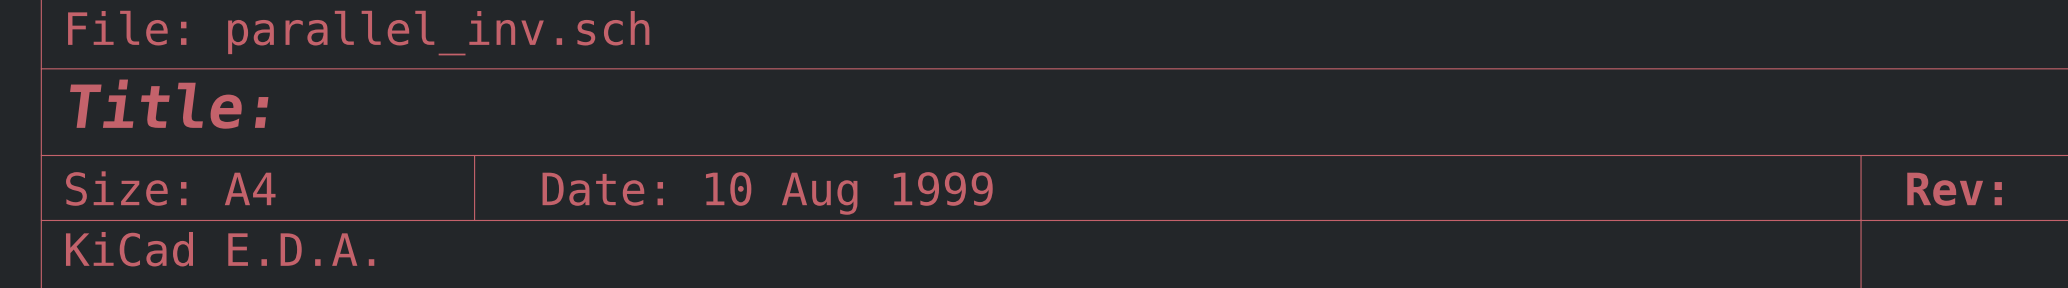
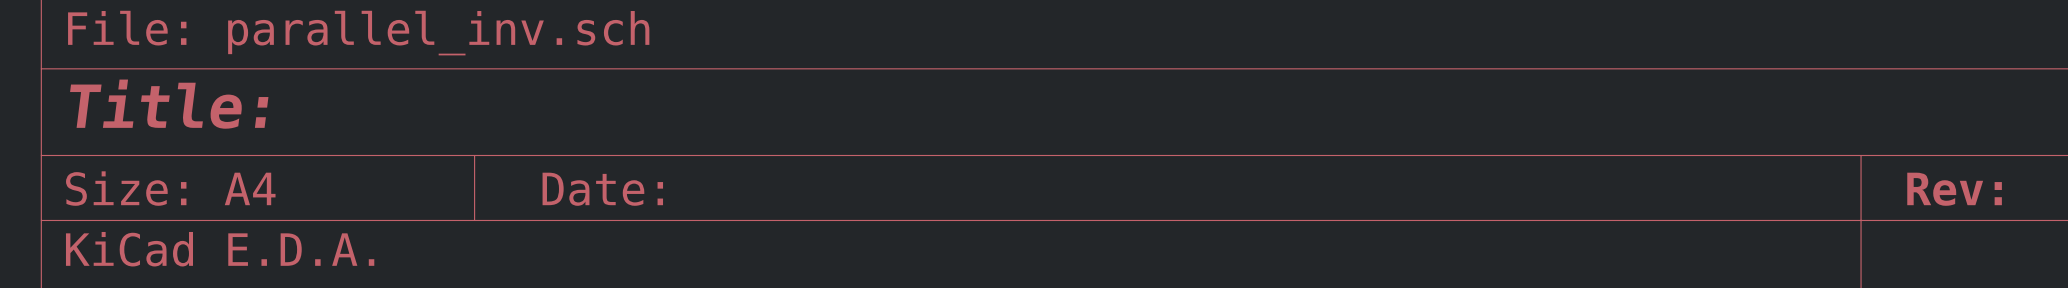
title block: Date: 10 Aug 1999 (767, 193) -> Date: (602, 189)

